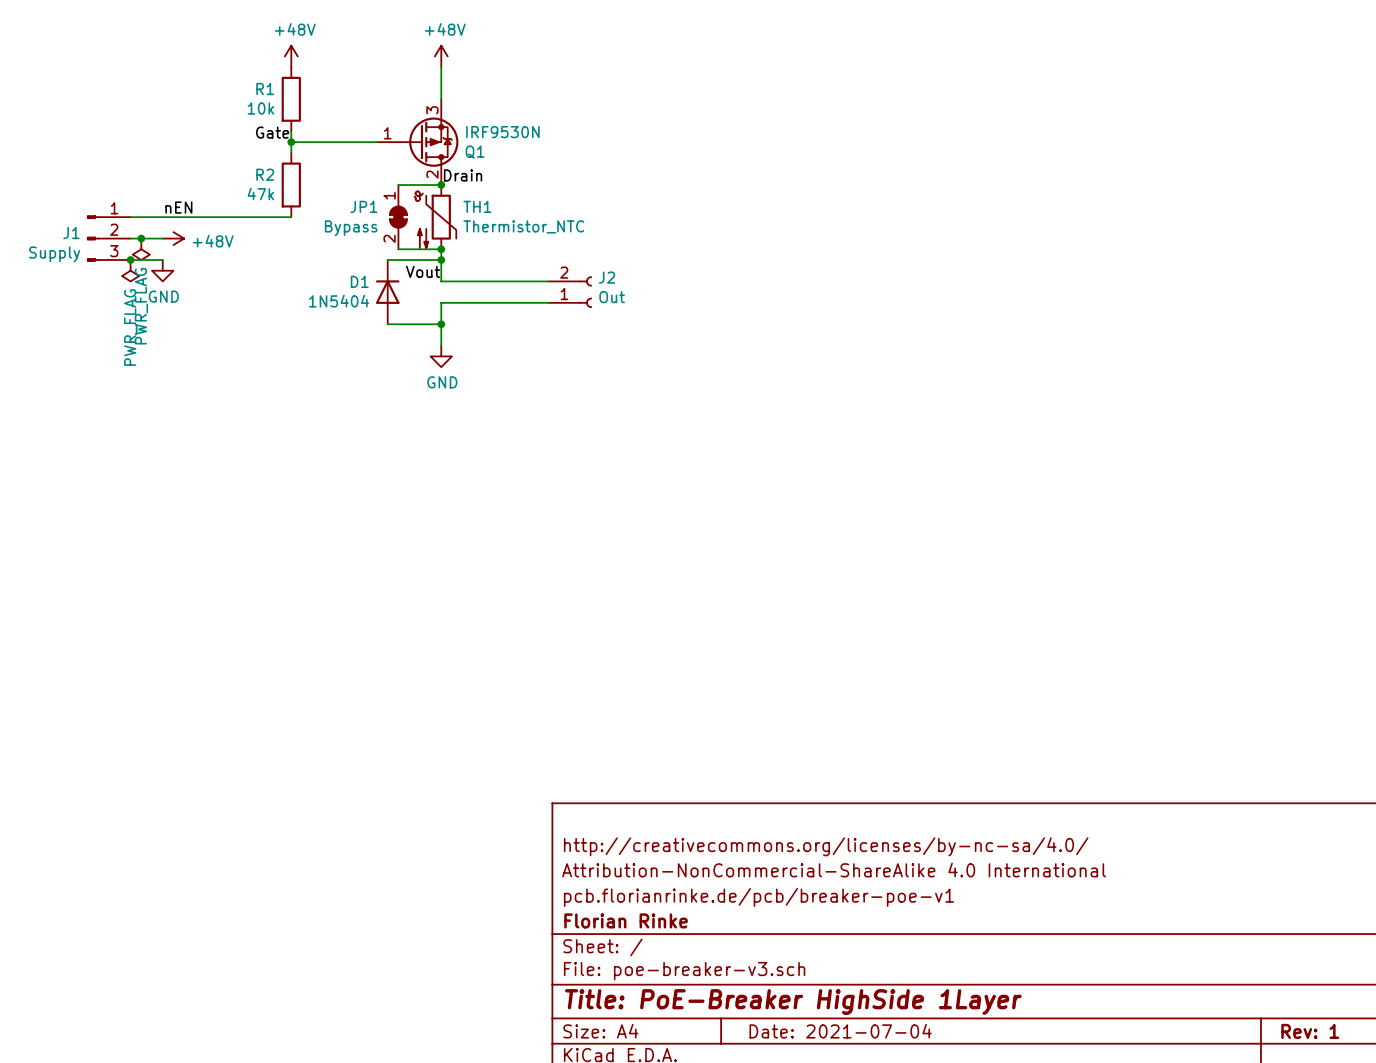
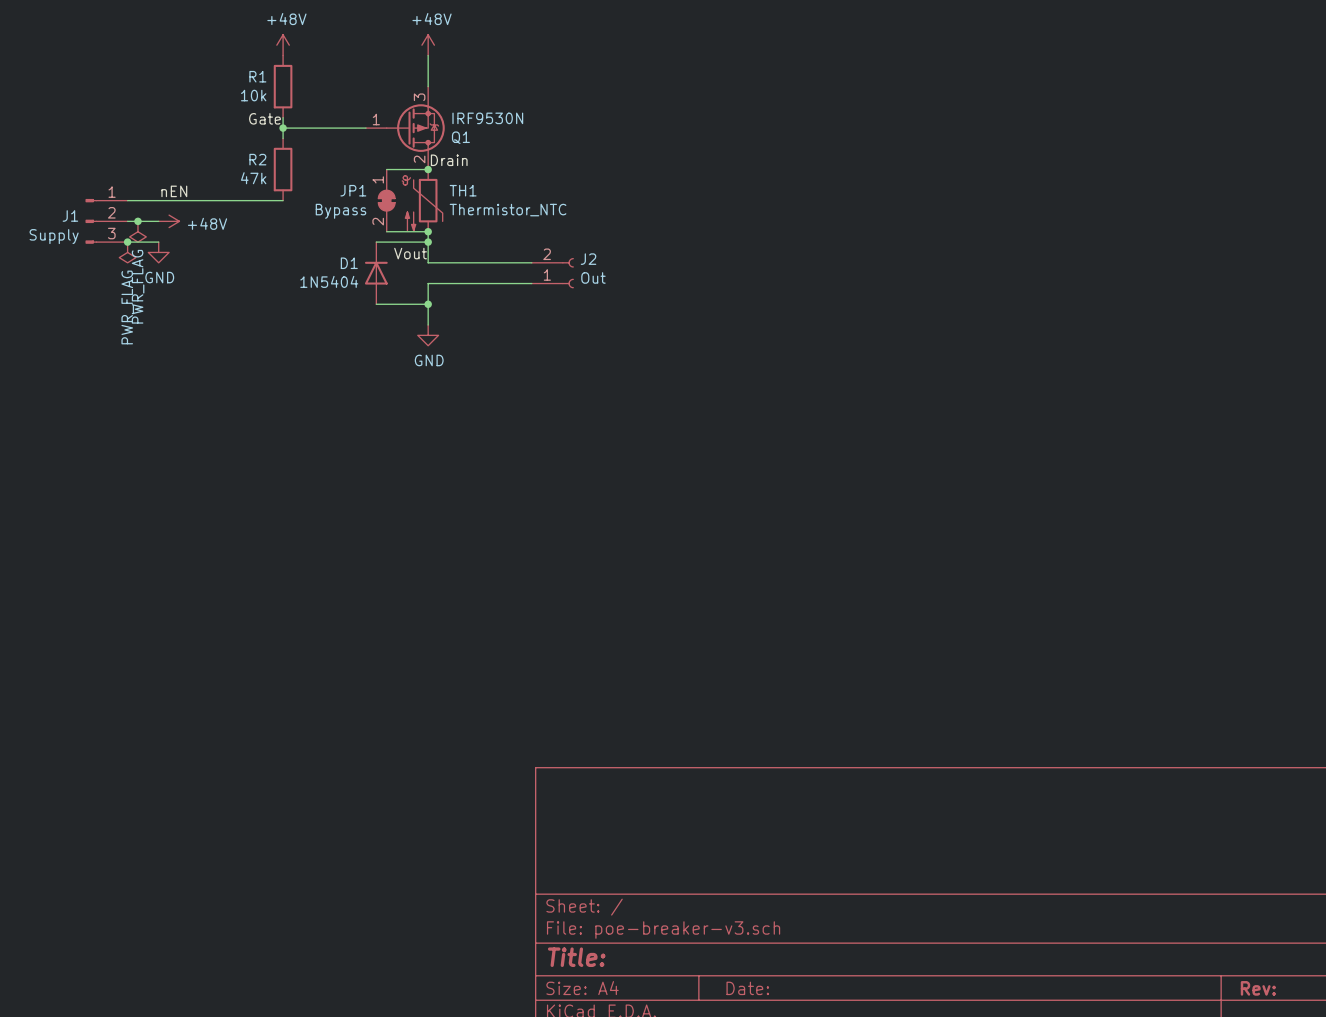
title block: http://creativecommons.org/licenses/by-nc-sa/4.0/ (826, 846) -> none
title block: Attribution-NonCommercial-ShareAlike 4.0 International (834, 870) -> none
title block: pcb.florianrinke.de/pcb/breaker-poe-v1 (759, 897) -> none
title block: Florian Rinke (626, 920) -> none
title block: Title: PoE-Breaker HighSide 1Layer (793, 1002) -> Title: (576, 957)
title block: Date: 2021-07-04 (840, 1031) -> Date: (747, 988)
title block: Rev: 1 (1310, 1031) -> Rev: (1258, 988)

